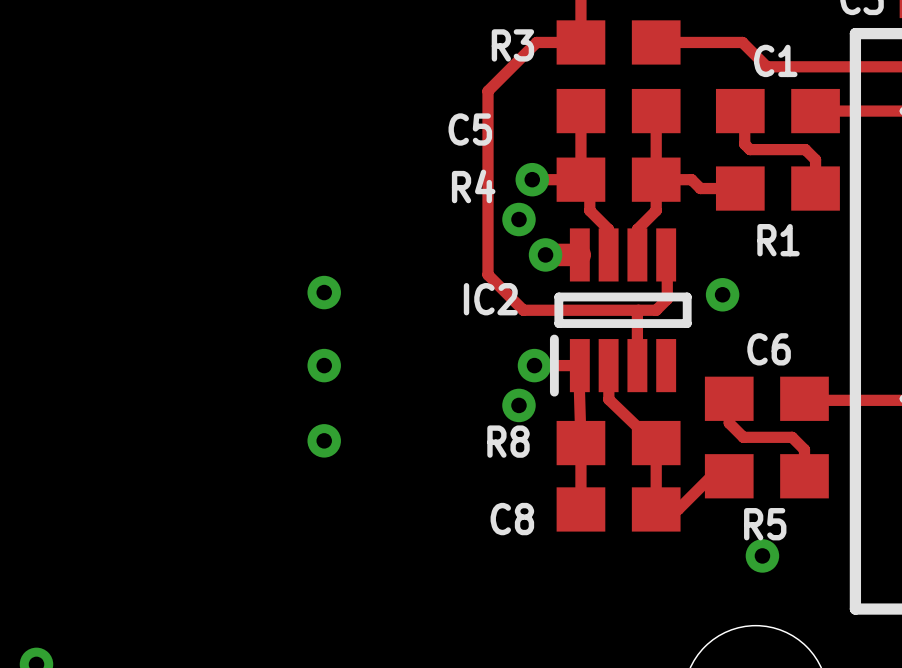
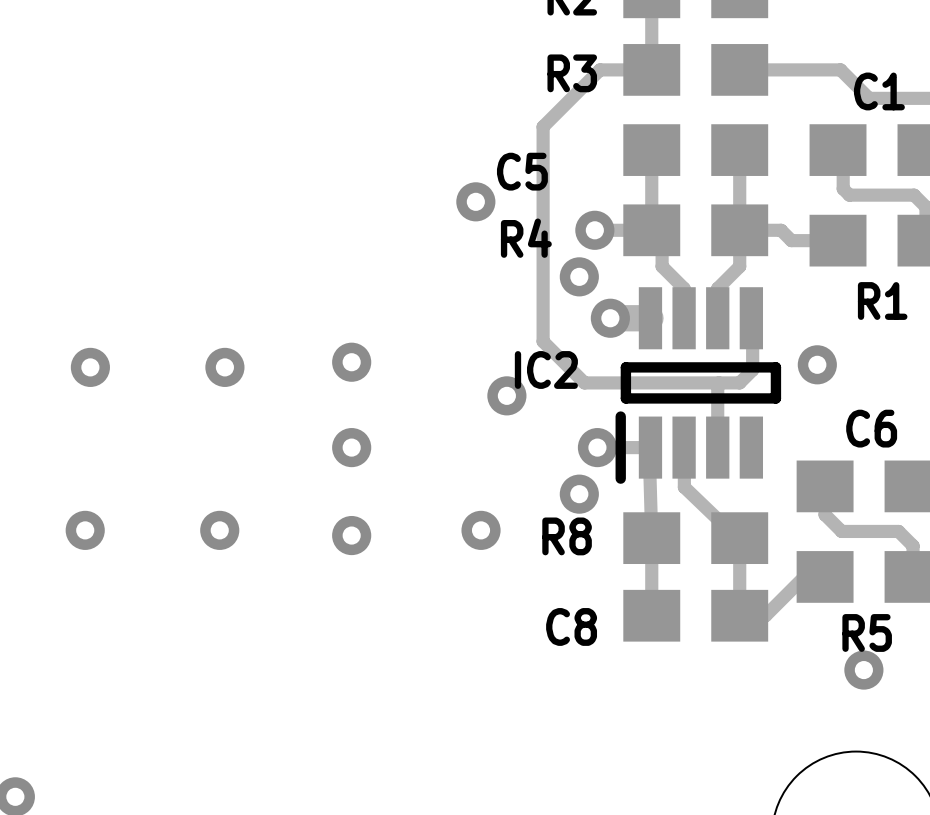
via: none -> (475, 201)
via: none -> (90, 367)
via: none -> (224, 367)
via: none -> (506, 395)
via: none -> (85, 530)
via: none -> (219, 530)
via: none -> (481, 530)

